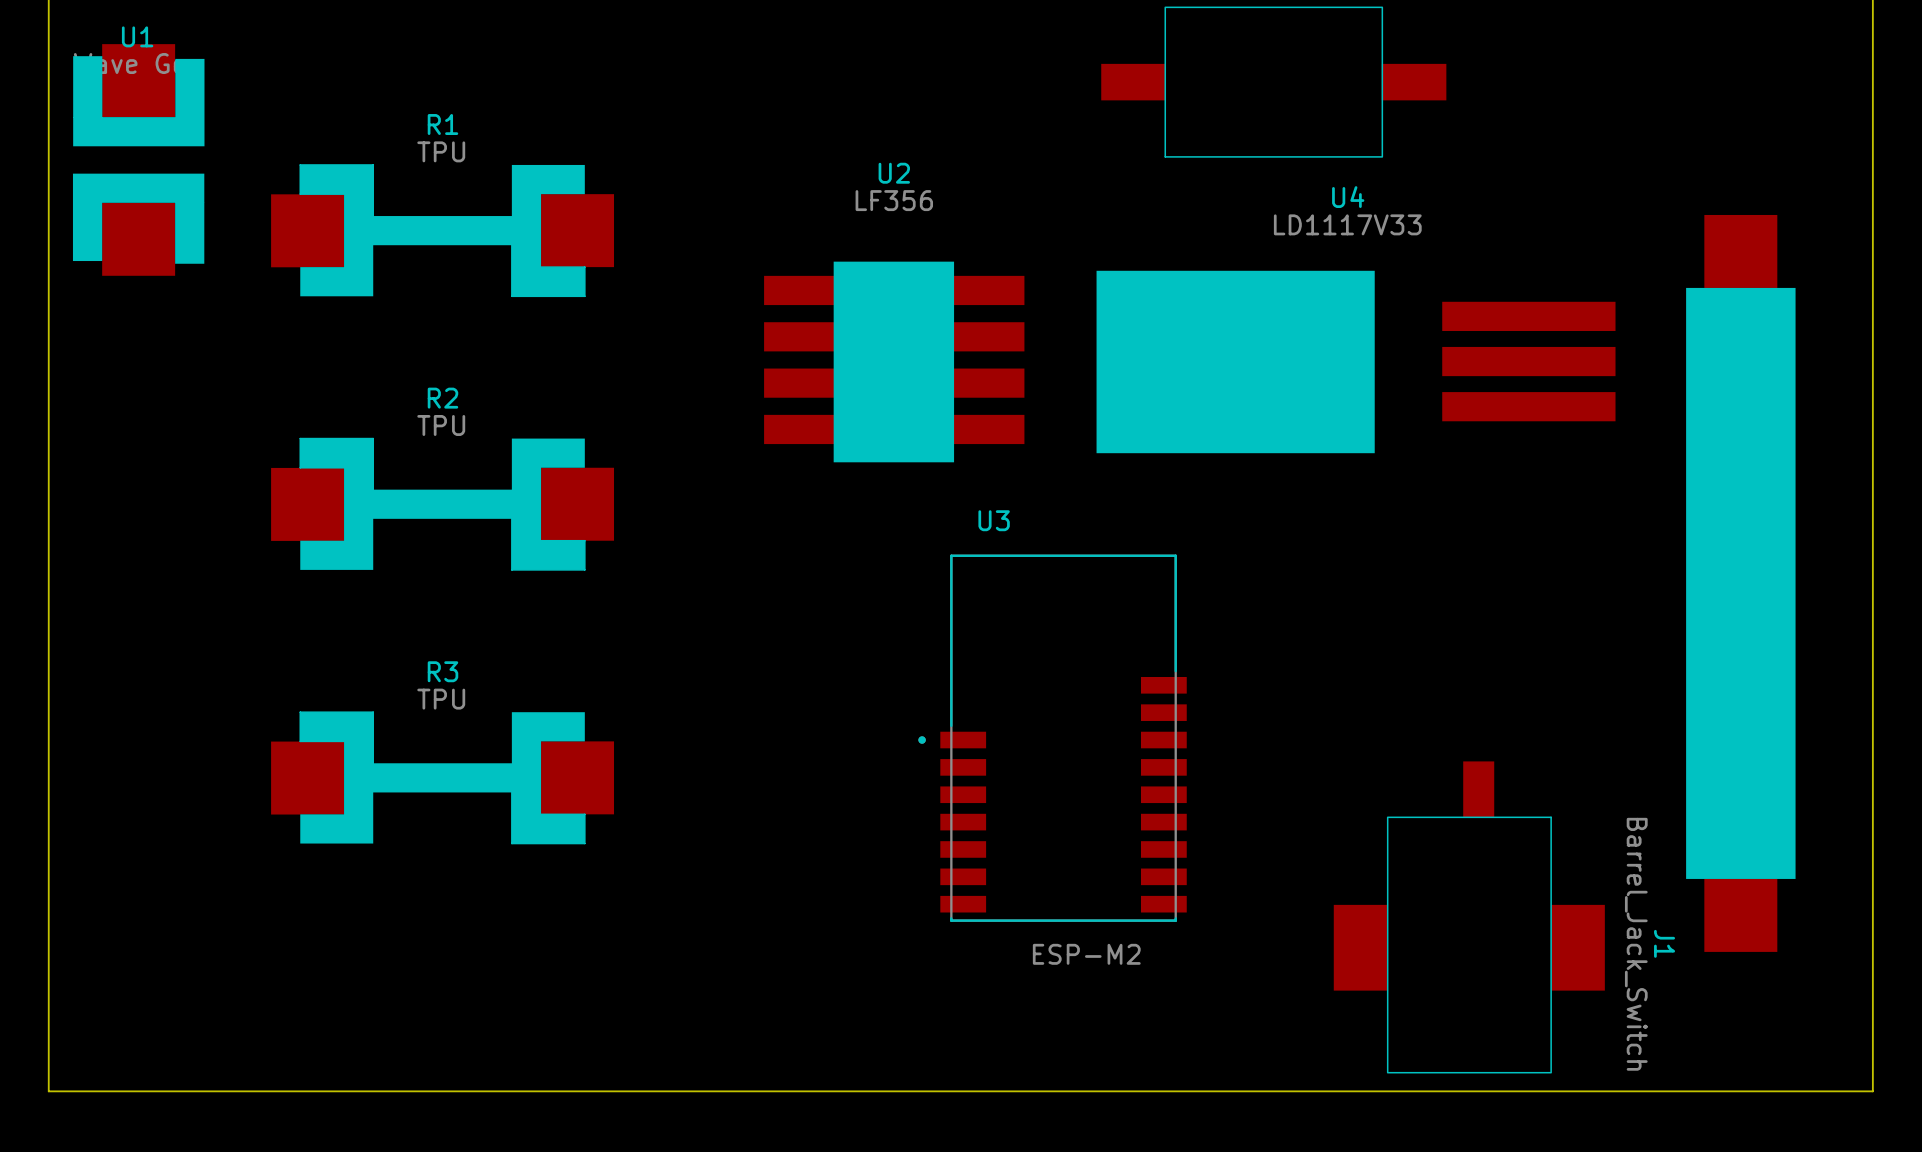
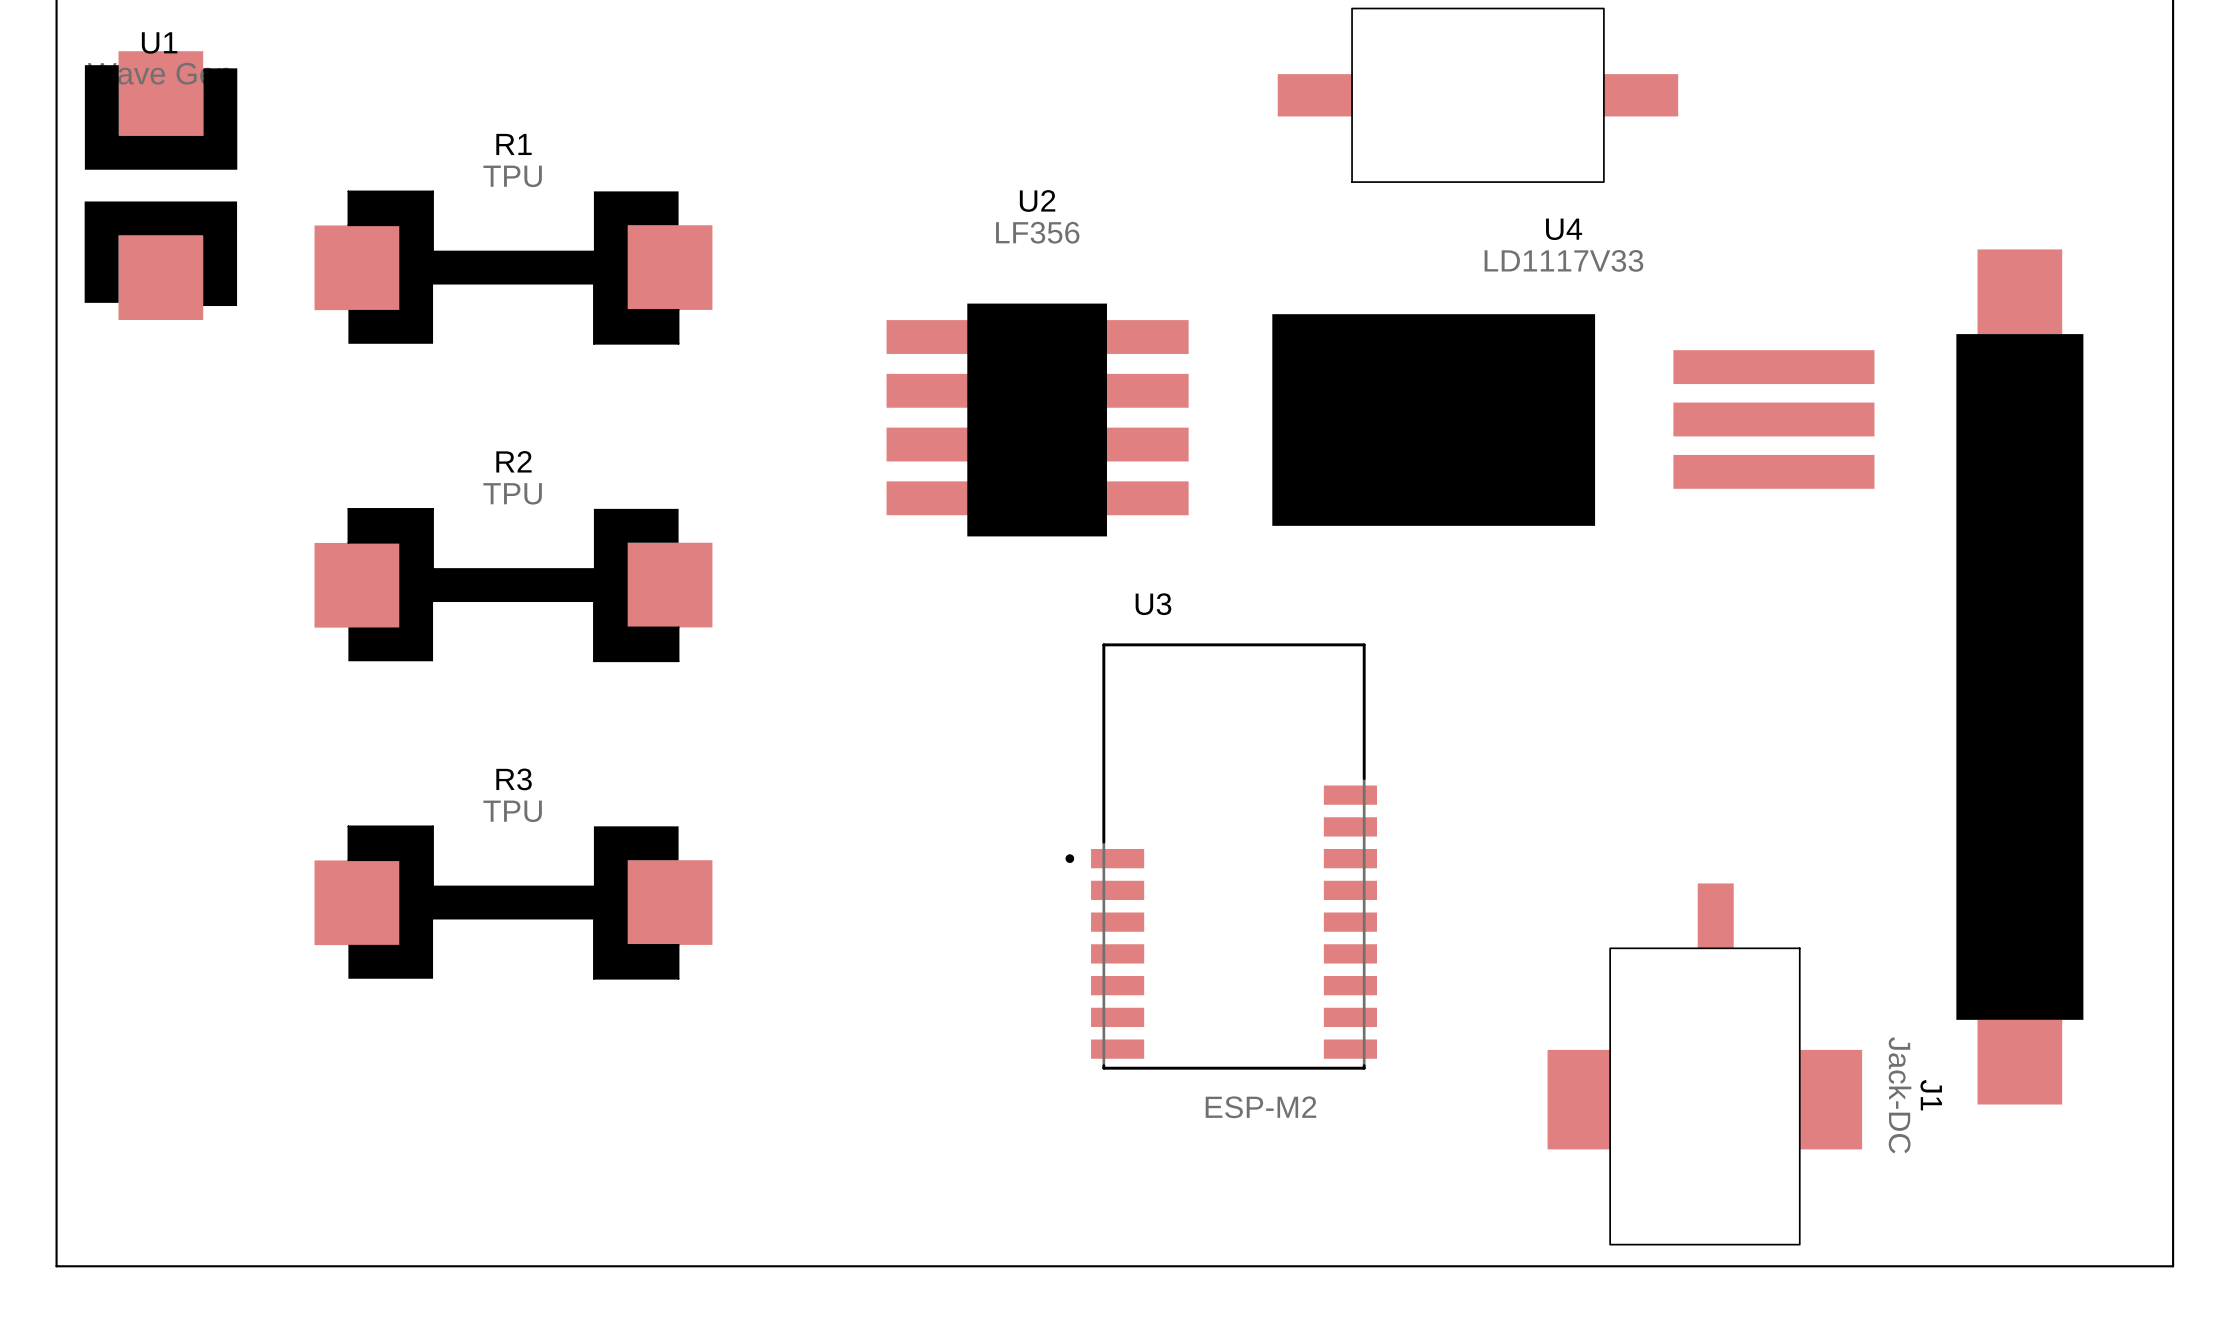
J1 value: Barrel_Jack_Switch (1636, 944) -> Jack-DC (1900, 1095)

